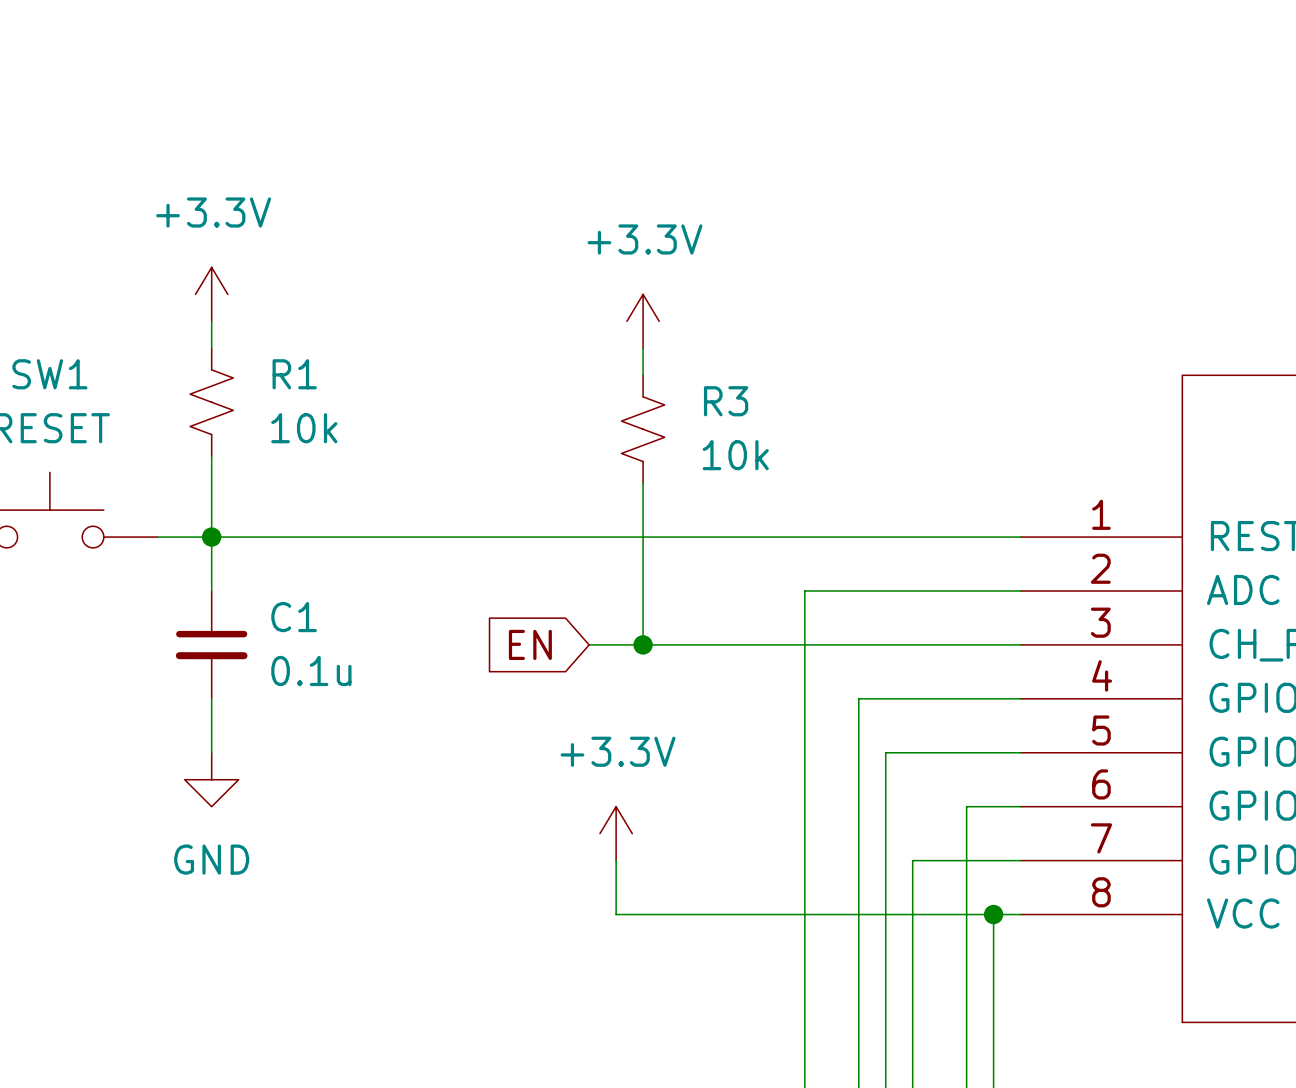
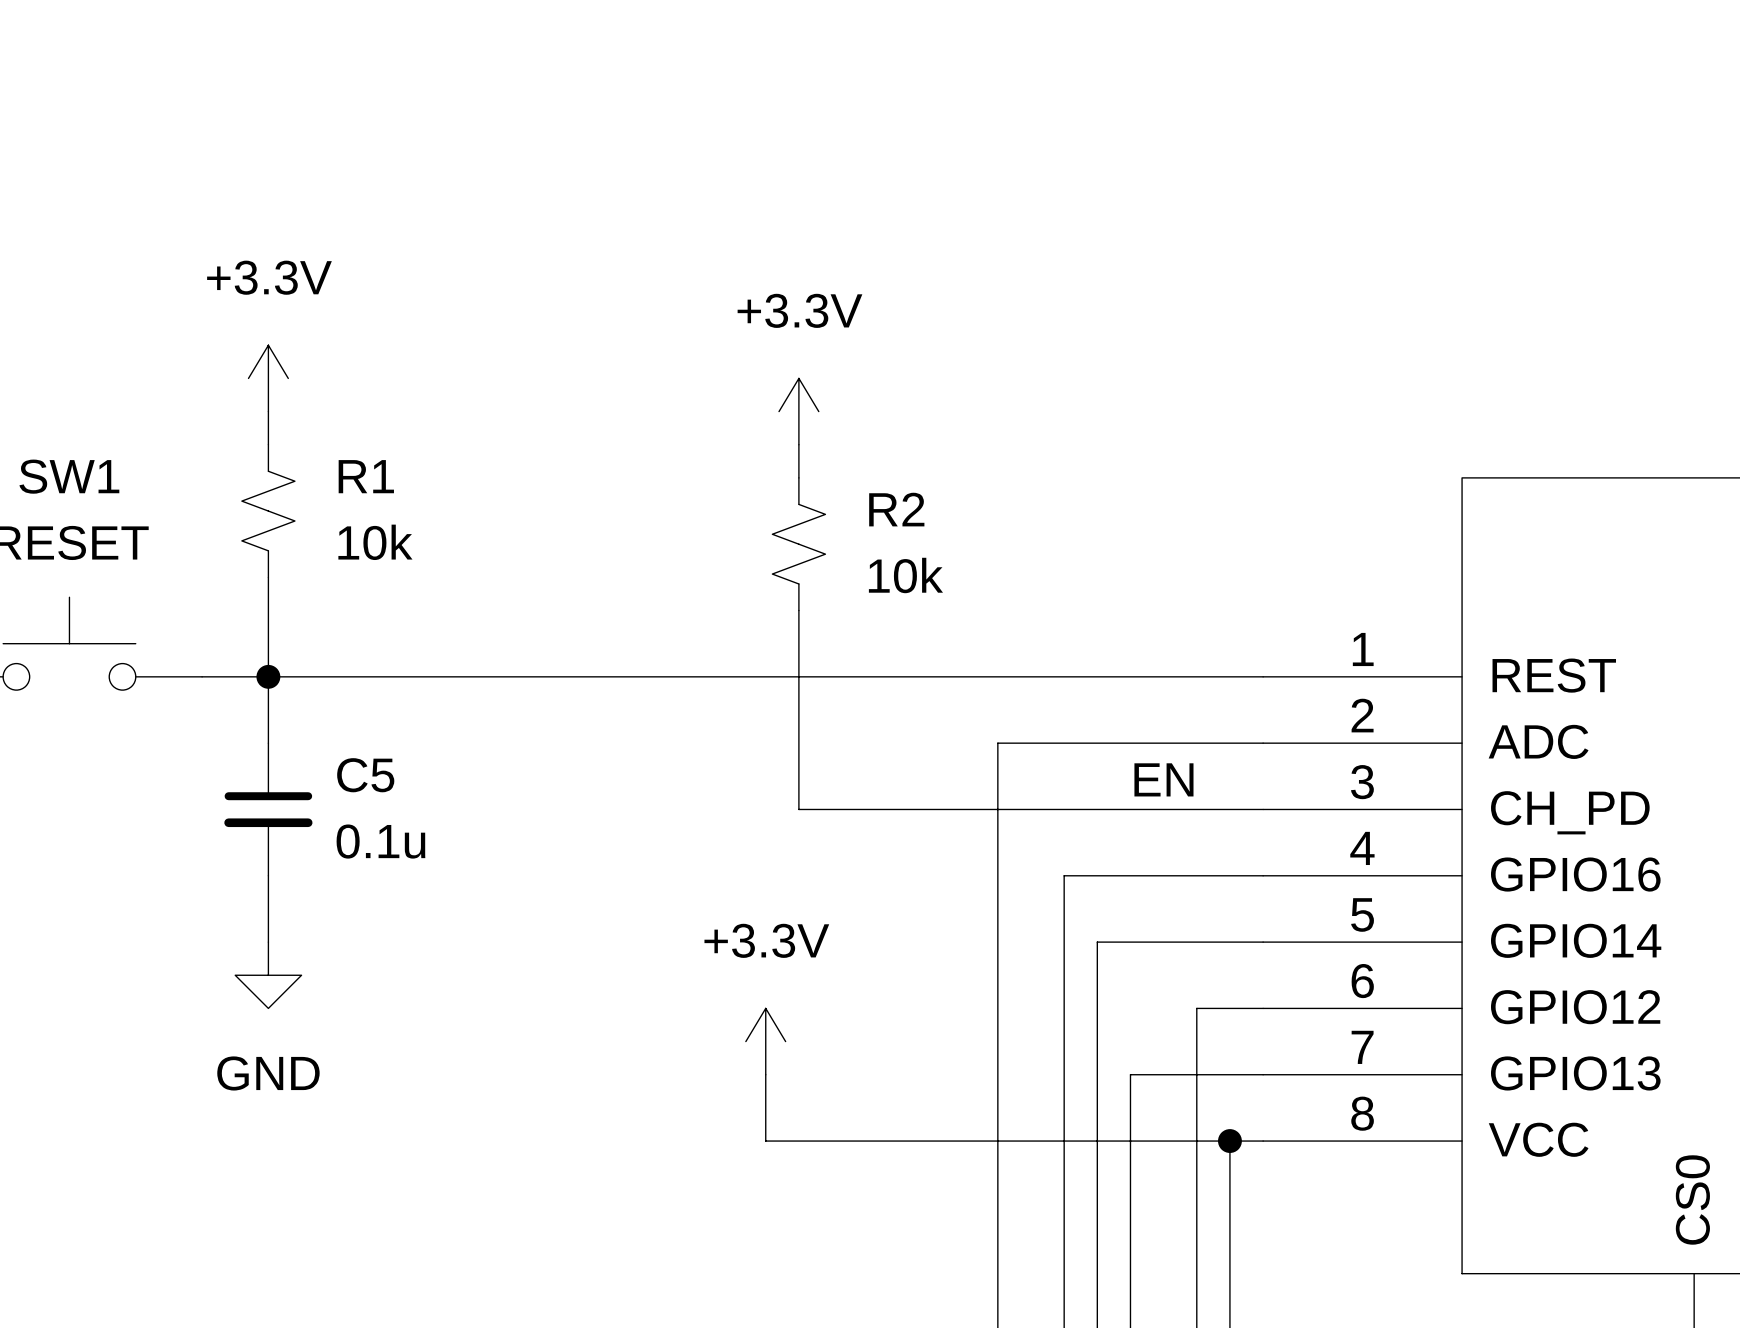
R3 name: R3 (726, 401) -> R2 (896, 509)
C1 name: C1 (294, 617) -> C5 (365, 775)
label: none -> EN (1163, 779)
global label: EN (530, 644) -> none
wire: (589, 644) (643, 644) -> none
junction: (643, 644) -> none

